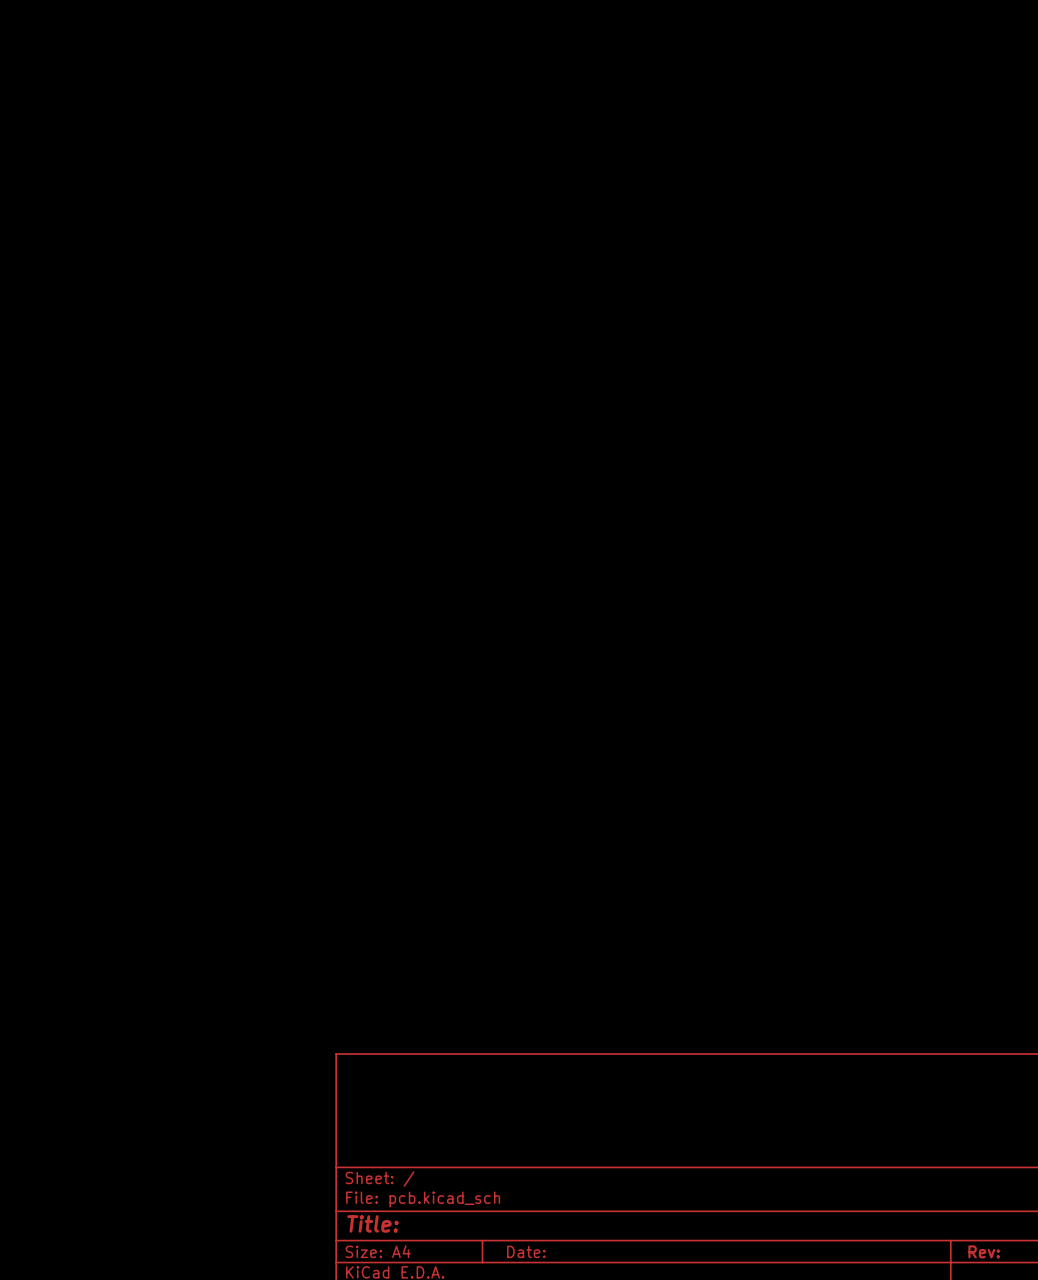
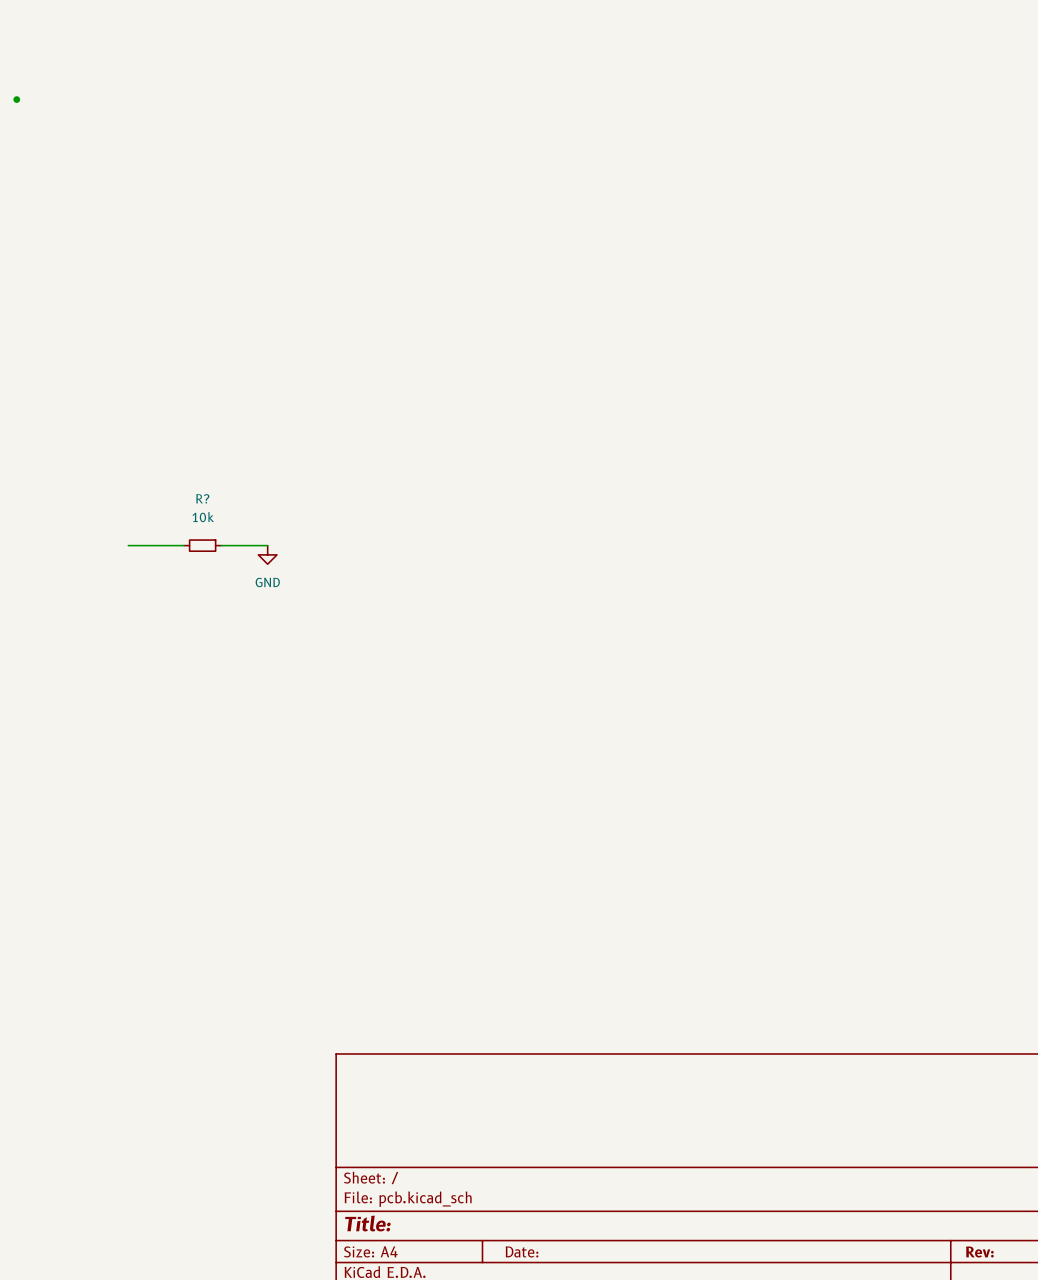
junction: none -> (16, 99)
wire: none -> (128, 545) (184, 545)
R?: none -> 10k (202, 545)
wire: none -> (221, 545) (267, 545)
power symbol: none -> GND (267, 554)

